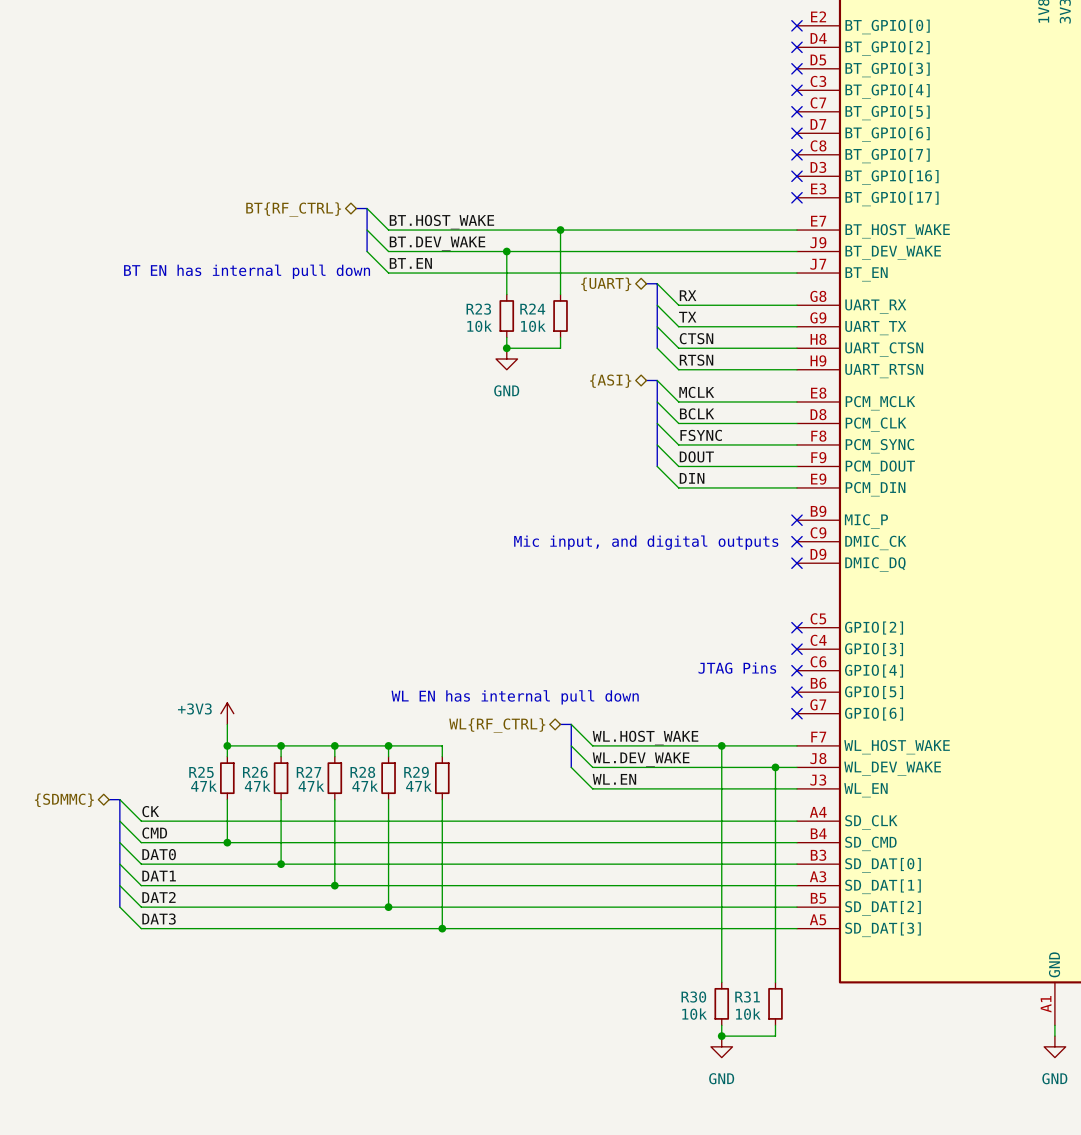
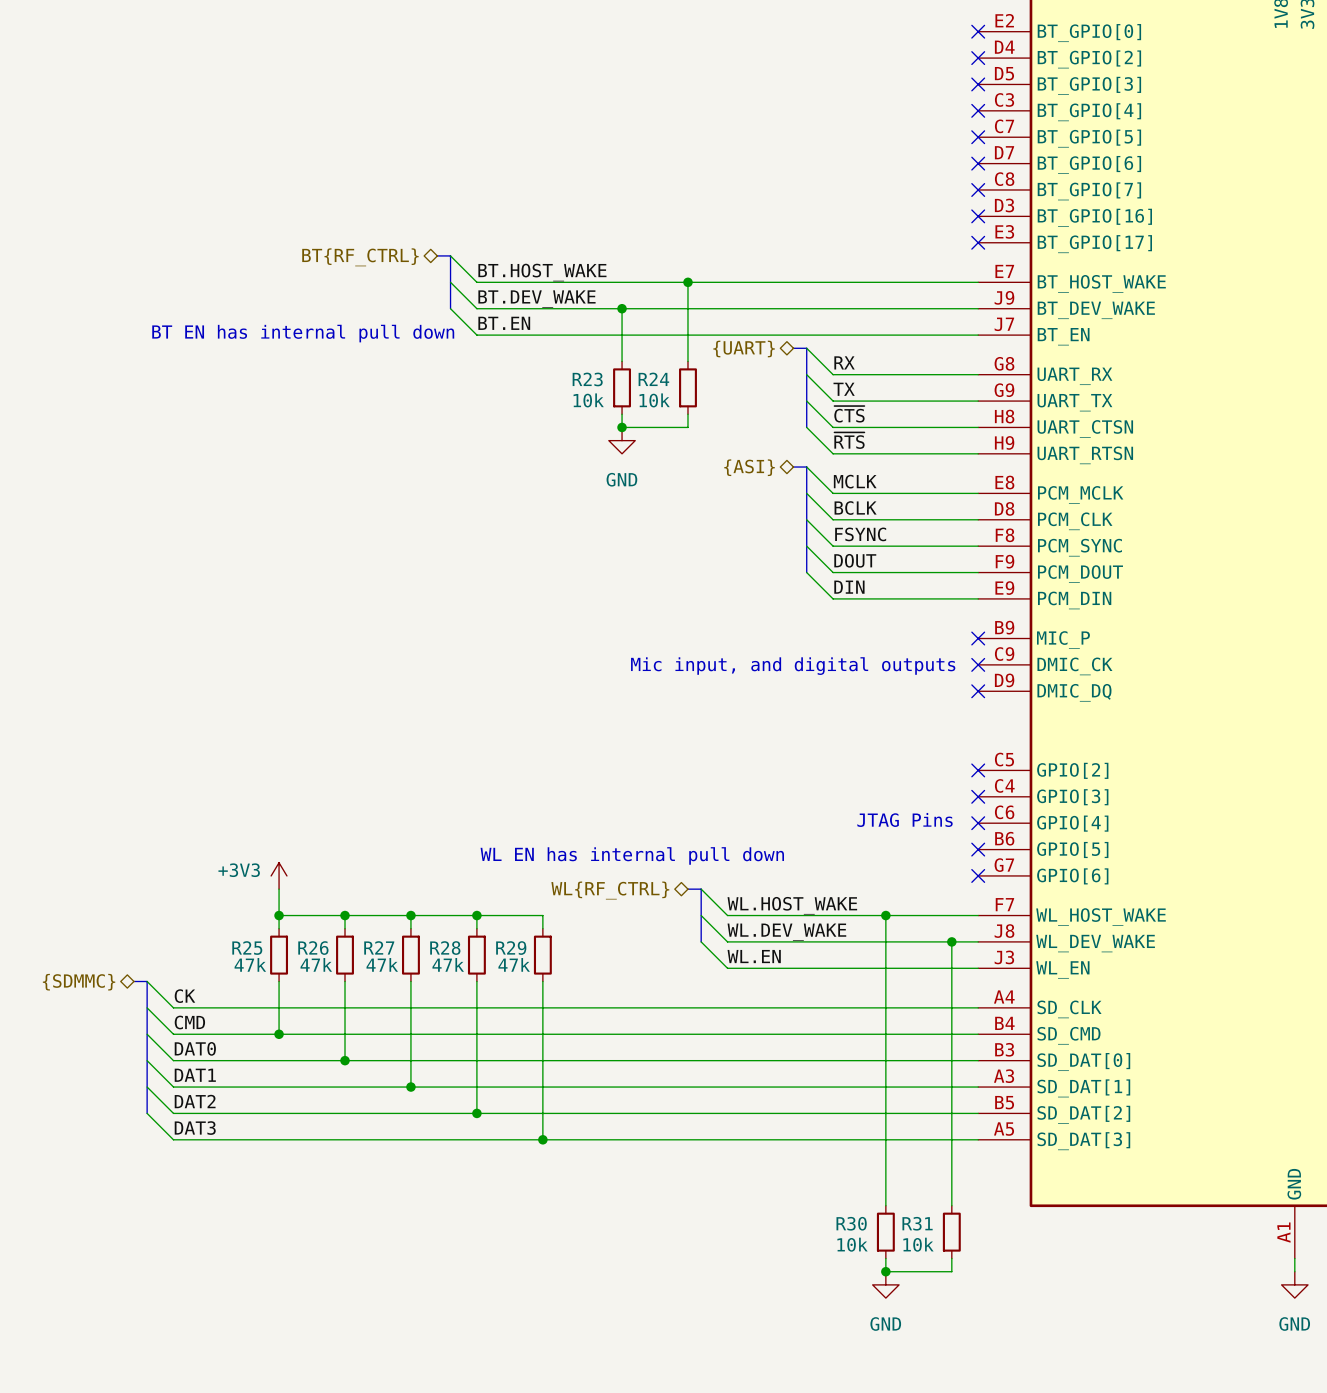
label: CTSN (696, 338) -> ~{CTS} (849, 414)
label: RTSN (696, 360) -> ~{RTS} (849, 440)

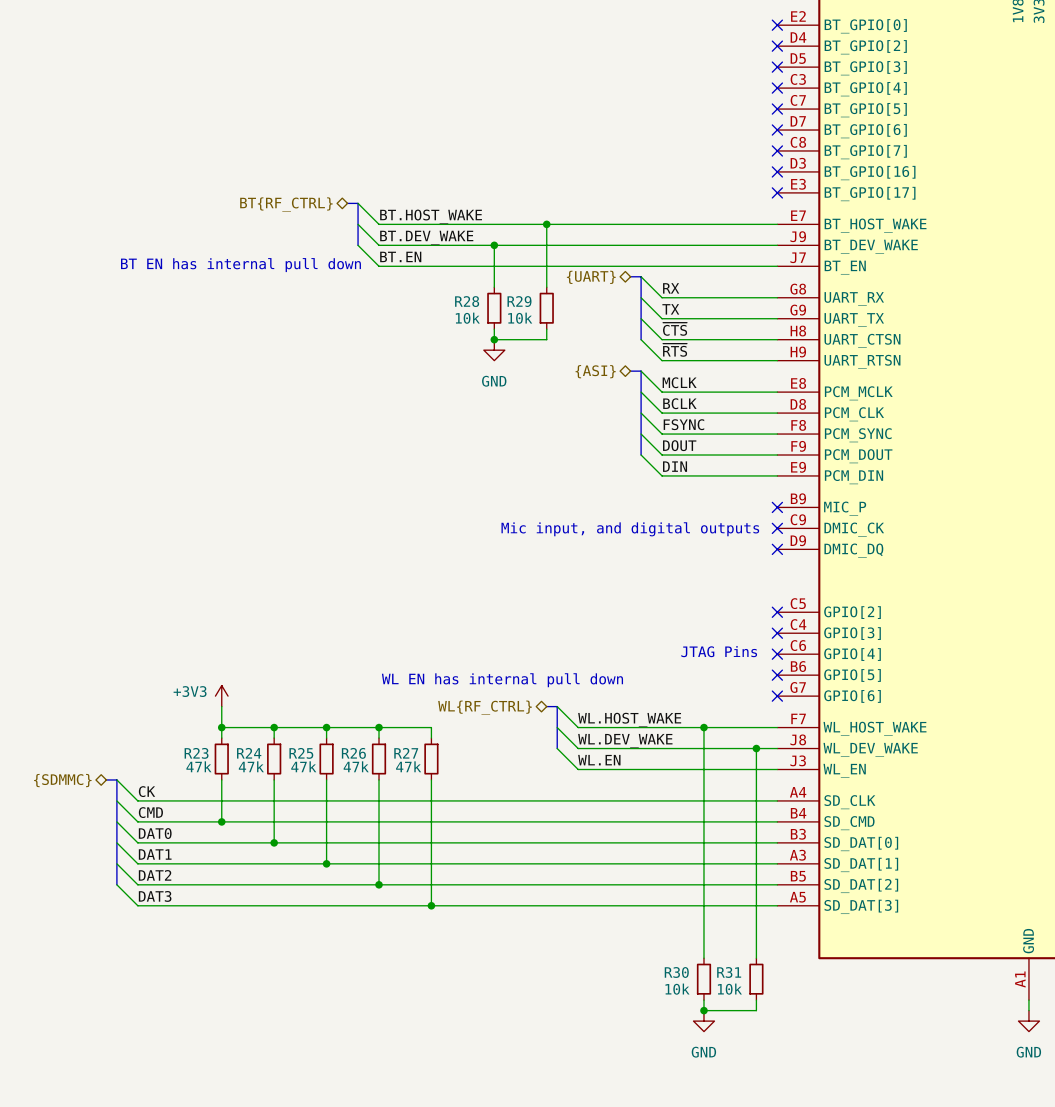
R23 name: R23 (587, 379) -> R28 (467, 301)
R24 name: R24 (653, 379) -> R29 (519, 301)
R27 name: R27 (379, 947) -> R25 (301, 753)
R25 name: R25 (247, 948) -> R23 (196, 753)
R26 name: R26 (313, 948) -> R24 (249, 753)
R28 name: R28 (445, 948) -> R26 (353, 753)
R29 name: R29 (511, 948) -> R27 (406, 753)

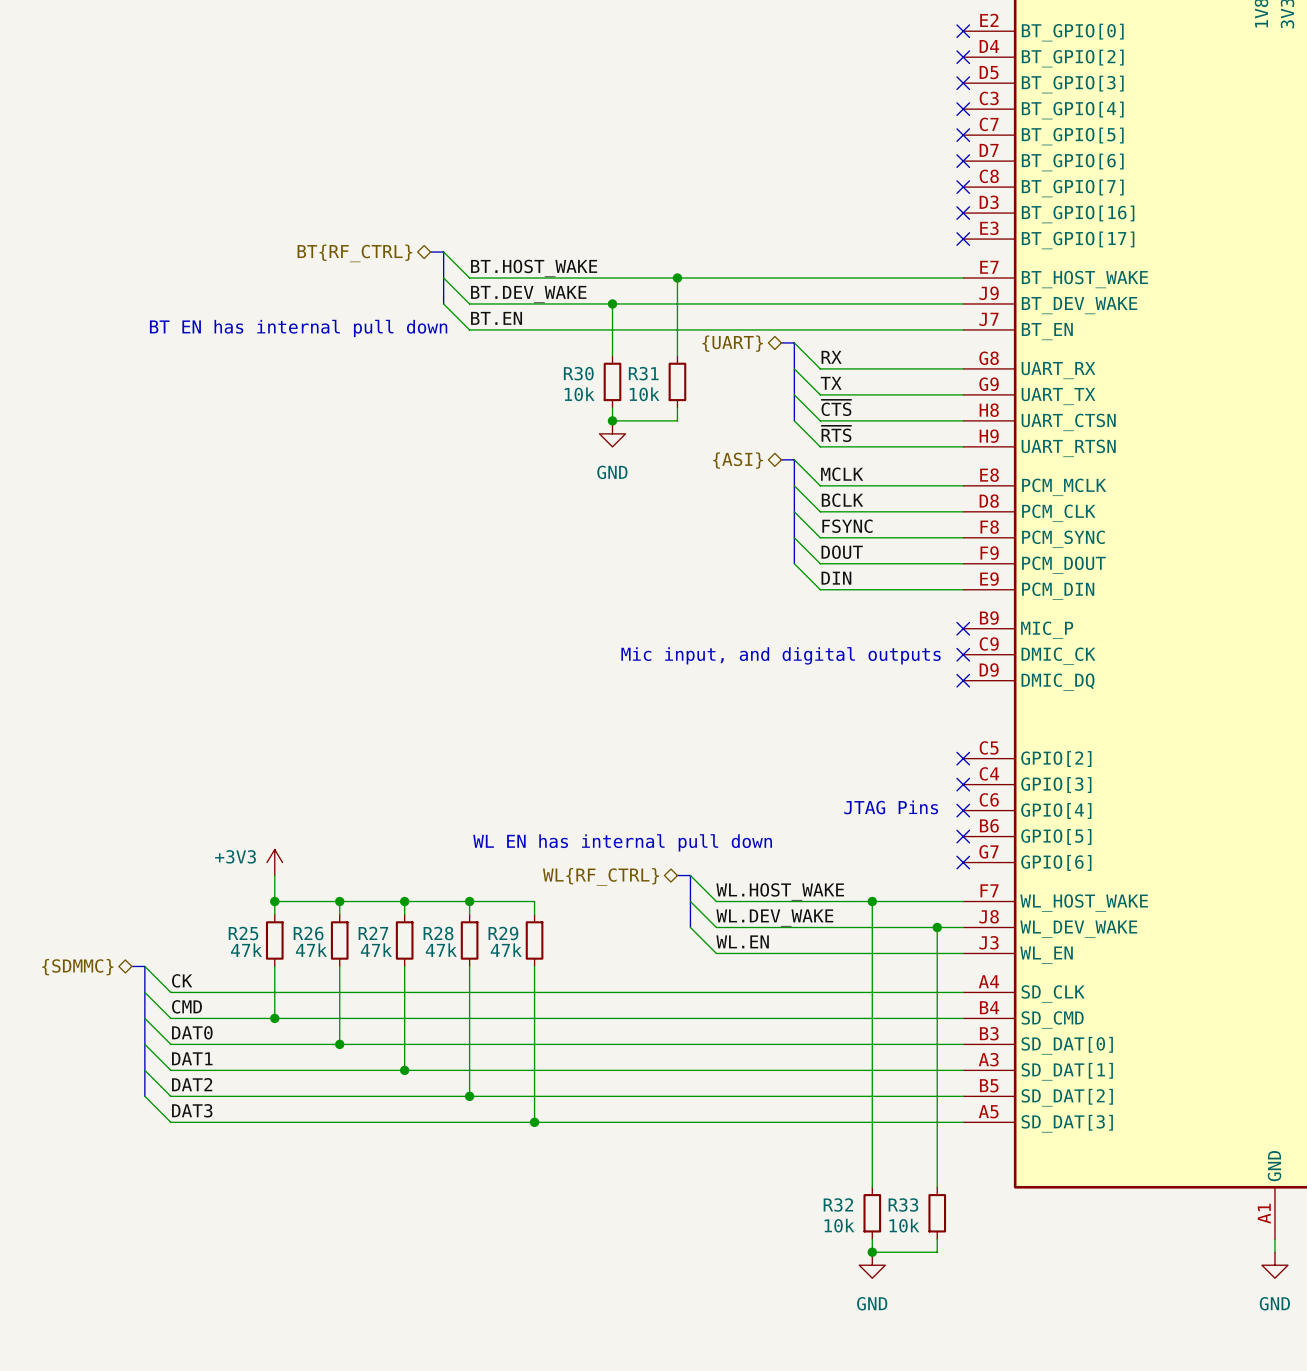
R28 name: R28 (467, 301) -> R30 (578, 373)
R29 name: R29 (519, 301) -> R31 (643, 373)
R23 name: R23 (196, 753) -> R25 (243, 933)
R24 name: R24 (249, 753) -> R26 (308, 933)
R25 name: R25 (301, 753) -> R27 (373, 933)
R26 name: R26 (353, 753) -> R28 (438, 933)
R27 name: R27 (406, 753) -> R29 (503, 933)
R30 name: R30 (676, 972) -> R32 (838, 1205)
R31 name: R31 (729, 972) -> R33 (903, 1205)

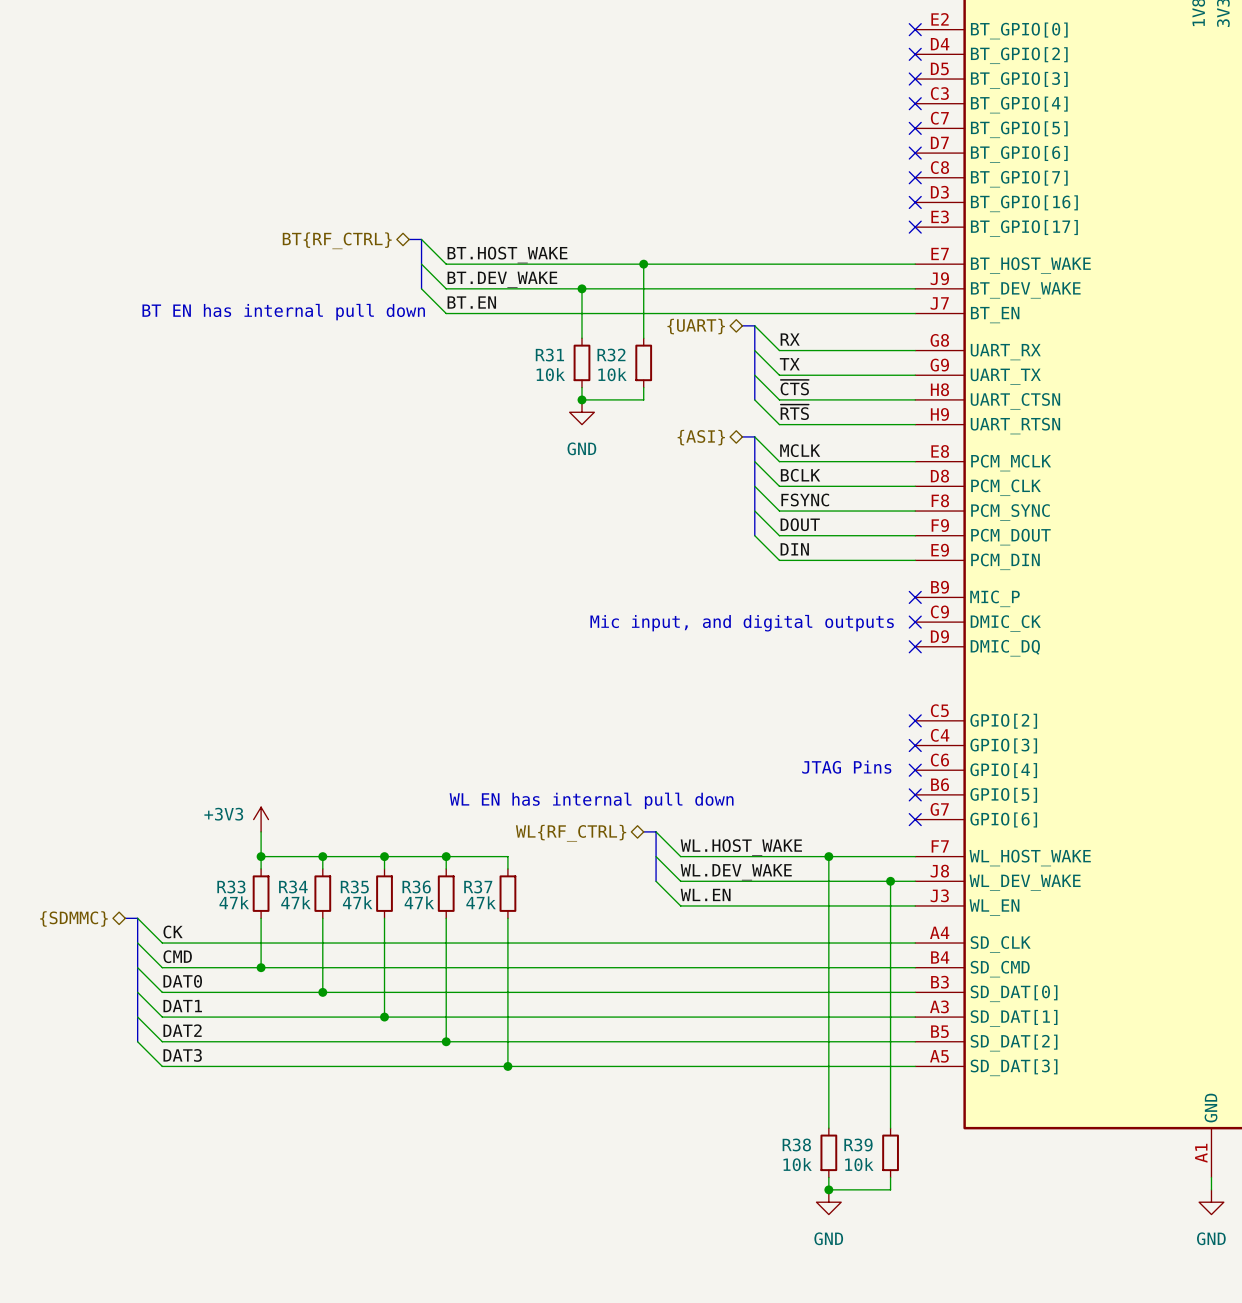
R30 name: R30 (578, 373) -> R31 (549, 355)
R31 name: R31 (643, 373) -> R32 (611, 355)
R25 name: R25 (243, 933) -> R33 (231, 887)
R26 name: R26 (308, 933) -> R34 (293, 887)
R27 name: R27 (373, 933) -> R35 (354, 887)
R28 name: R28 (438, 933) -> R36 (416, 887)
R29 name: R29 (503, 933) -> R37 (478, 887)
R32 name: R32 (838, 1205) -> R38 (796, 1144)
R33 name: R33 (903, 1205) -> R39 (858, 1144)

